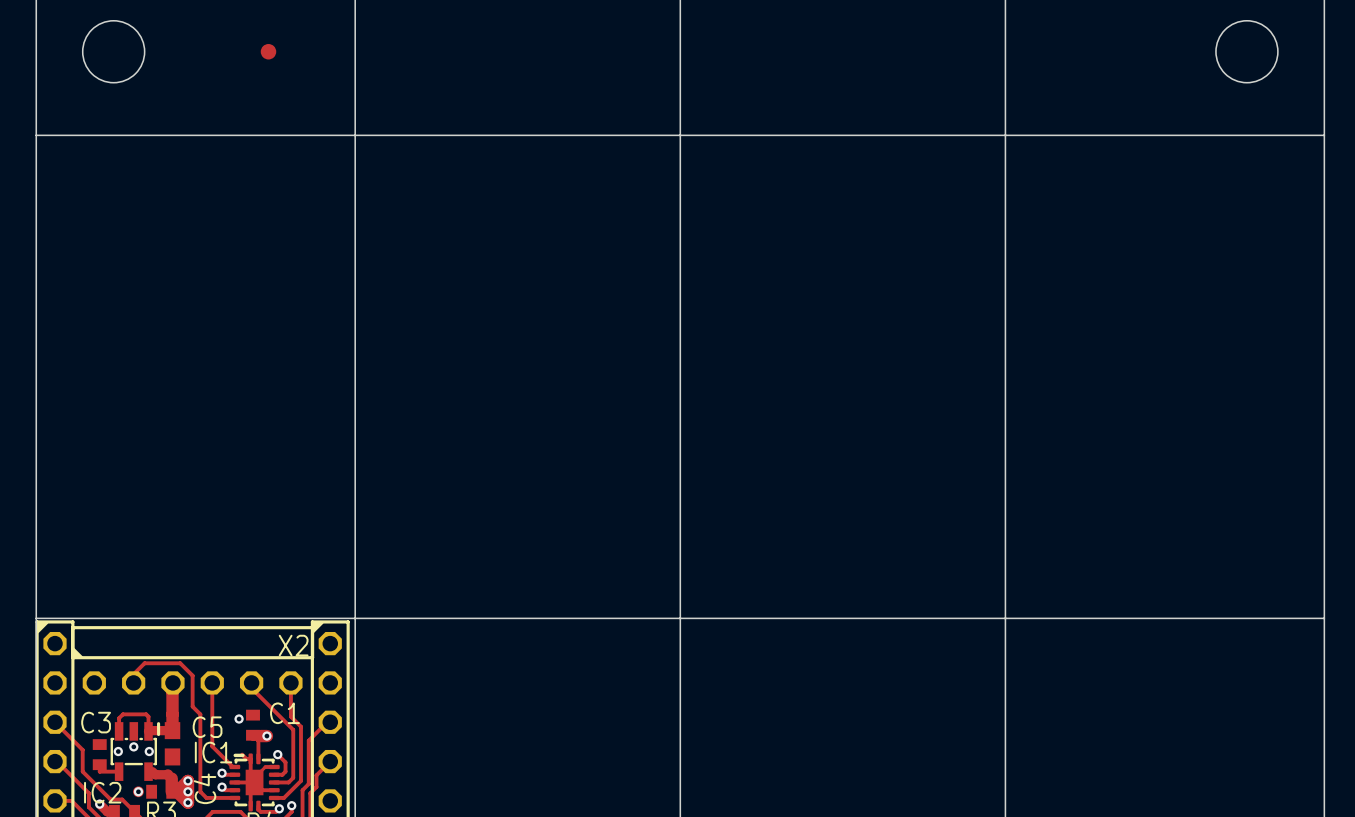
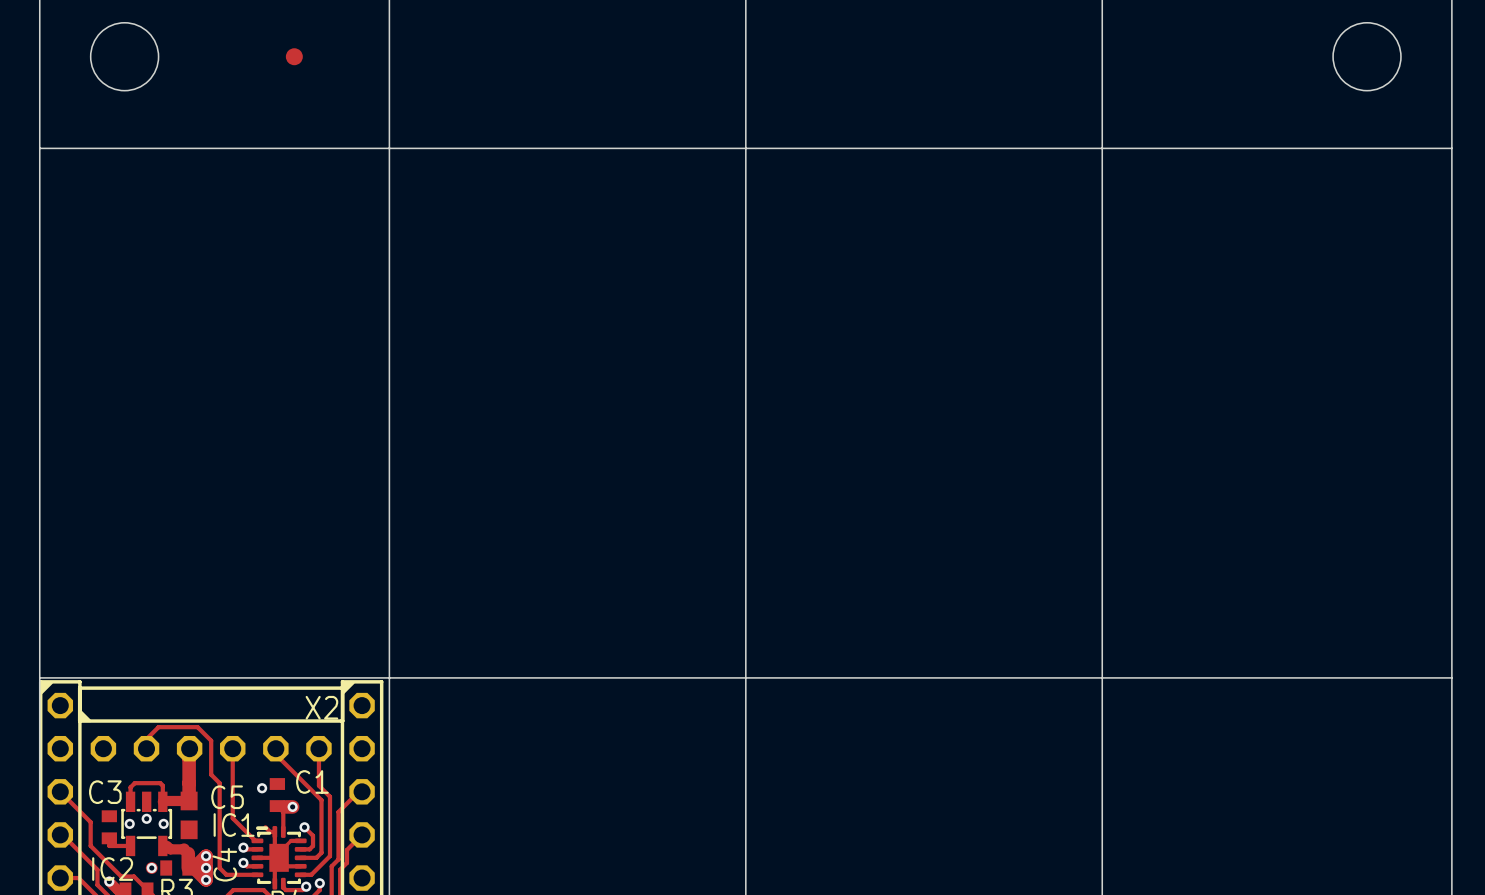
line: (158, 723) (158, 734) -> none

